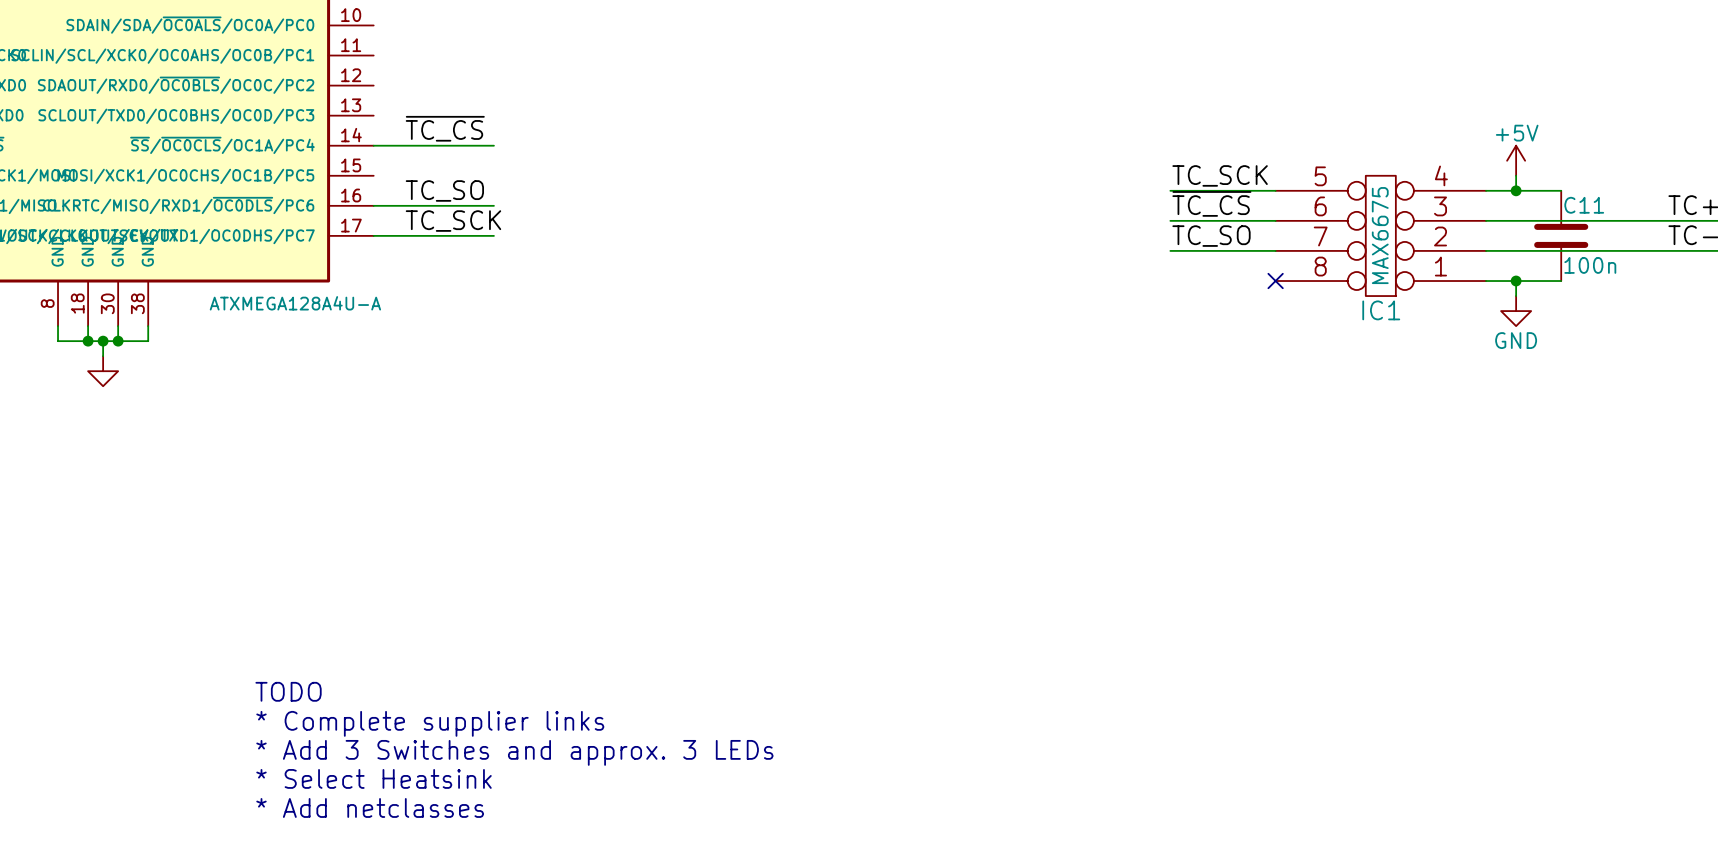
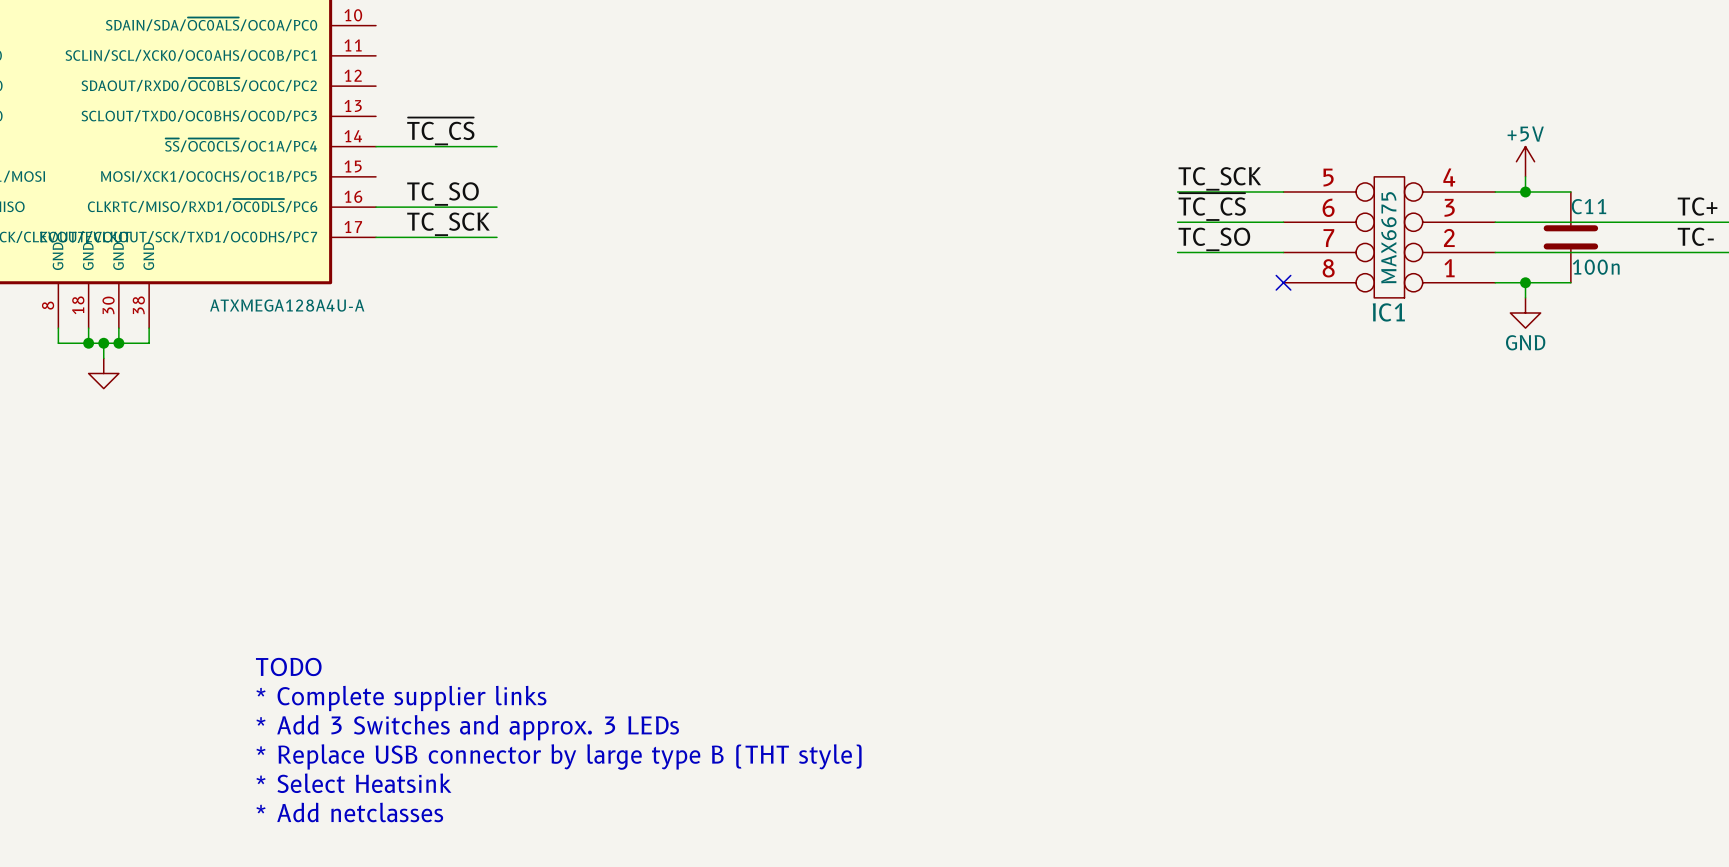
text: none -> TODO (288, 666)
text: TODO (288, 691) -> * Complete supplier links (401, 698)
text: * Complete supplier links (430, 723) -> * Add 3 Switches and approx. 3 LEDs (467, 727)
text: * Add 3 Switches and approx. 3 LEDs (514, 752) -> * Replace USB connector by large type B (THT style) (559, 757)

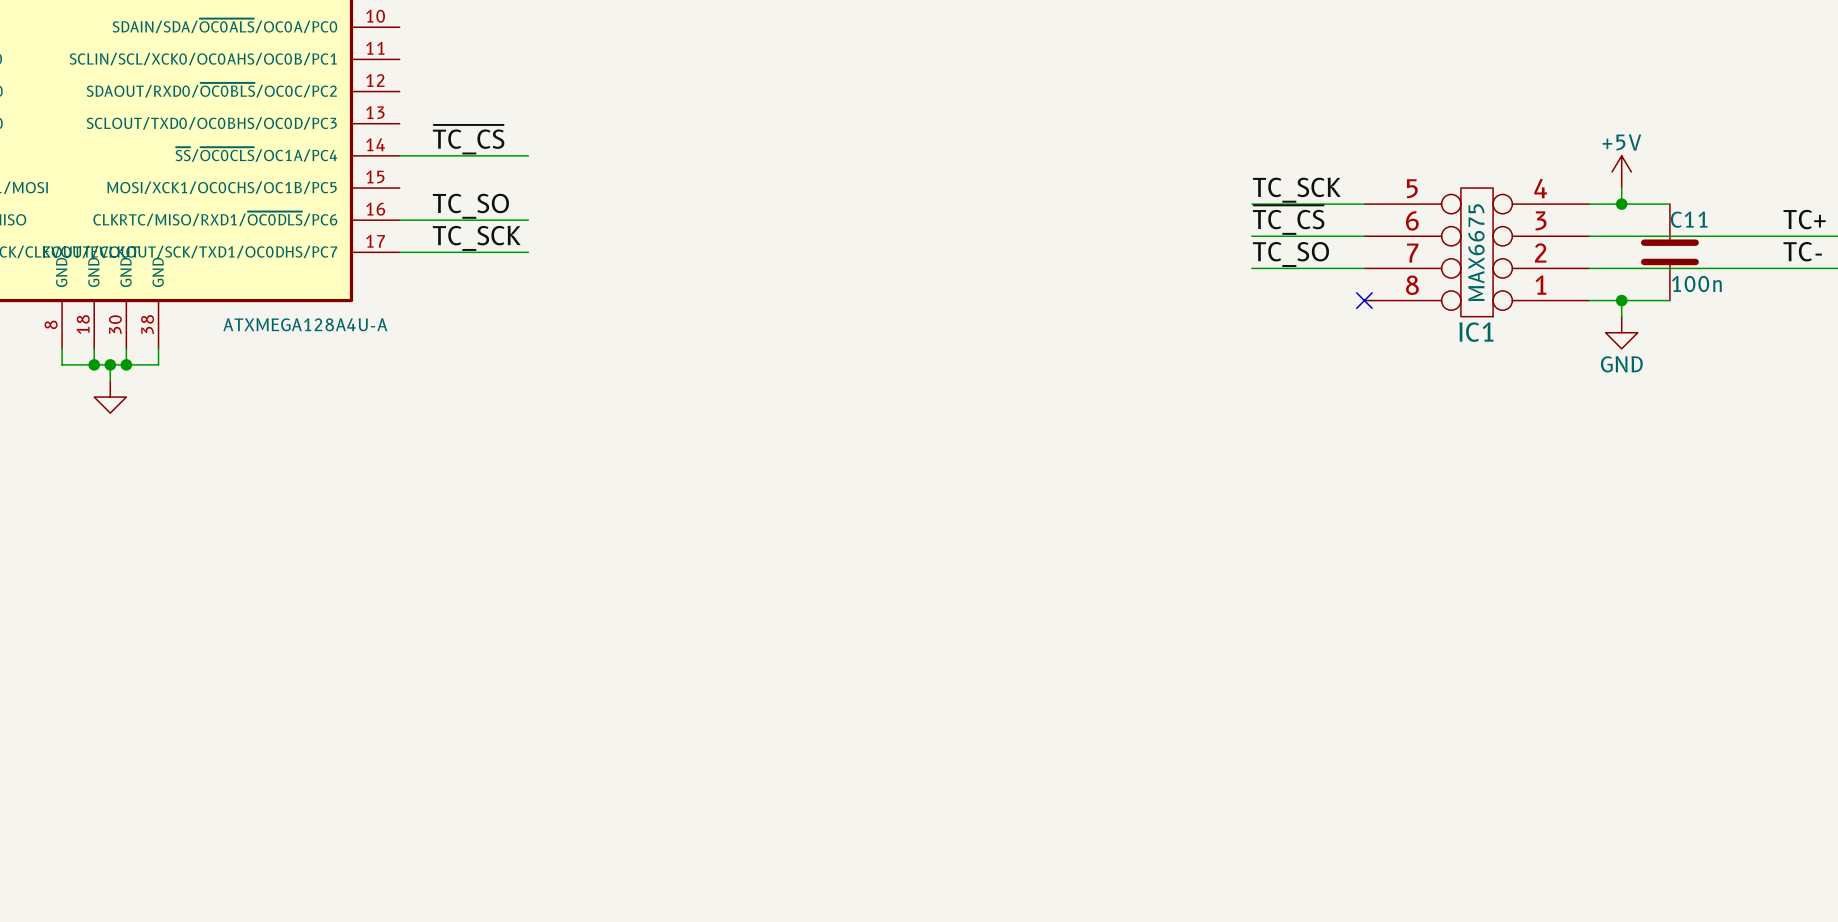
text: TODO (288, 666) -> none
text: * Complete supplier links (401, 698) -> none
text: * Add 3 Switches and approx. 3 LEDs (467, 727) -> none
text: * Replace USB connector by large type B (THT style) (559, 757) -> none
text: * Select Heatsink (353, 783) -> none
text: * Add netclasses (349, 812) -> none

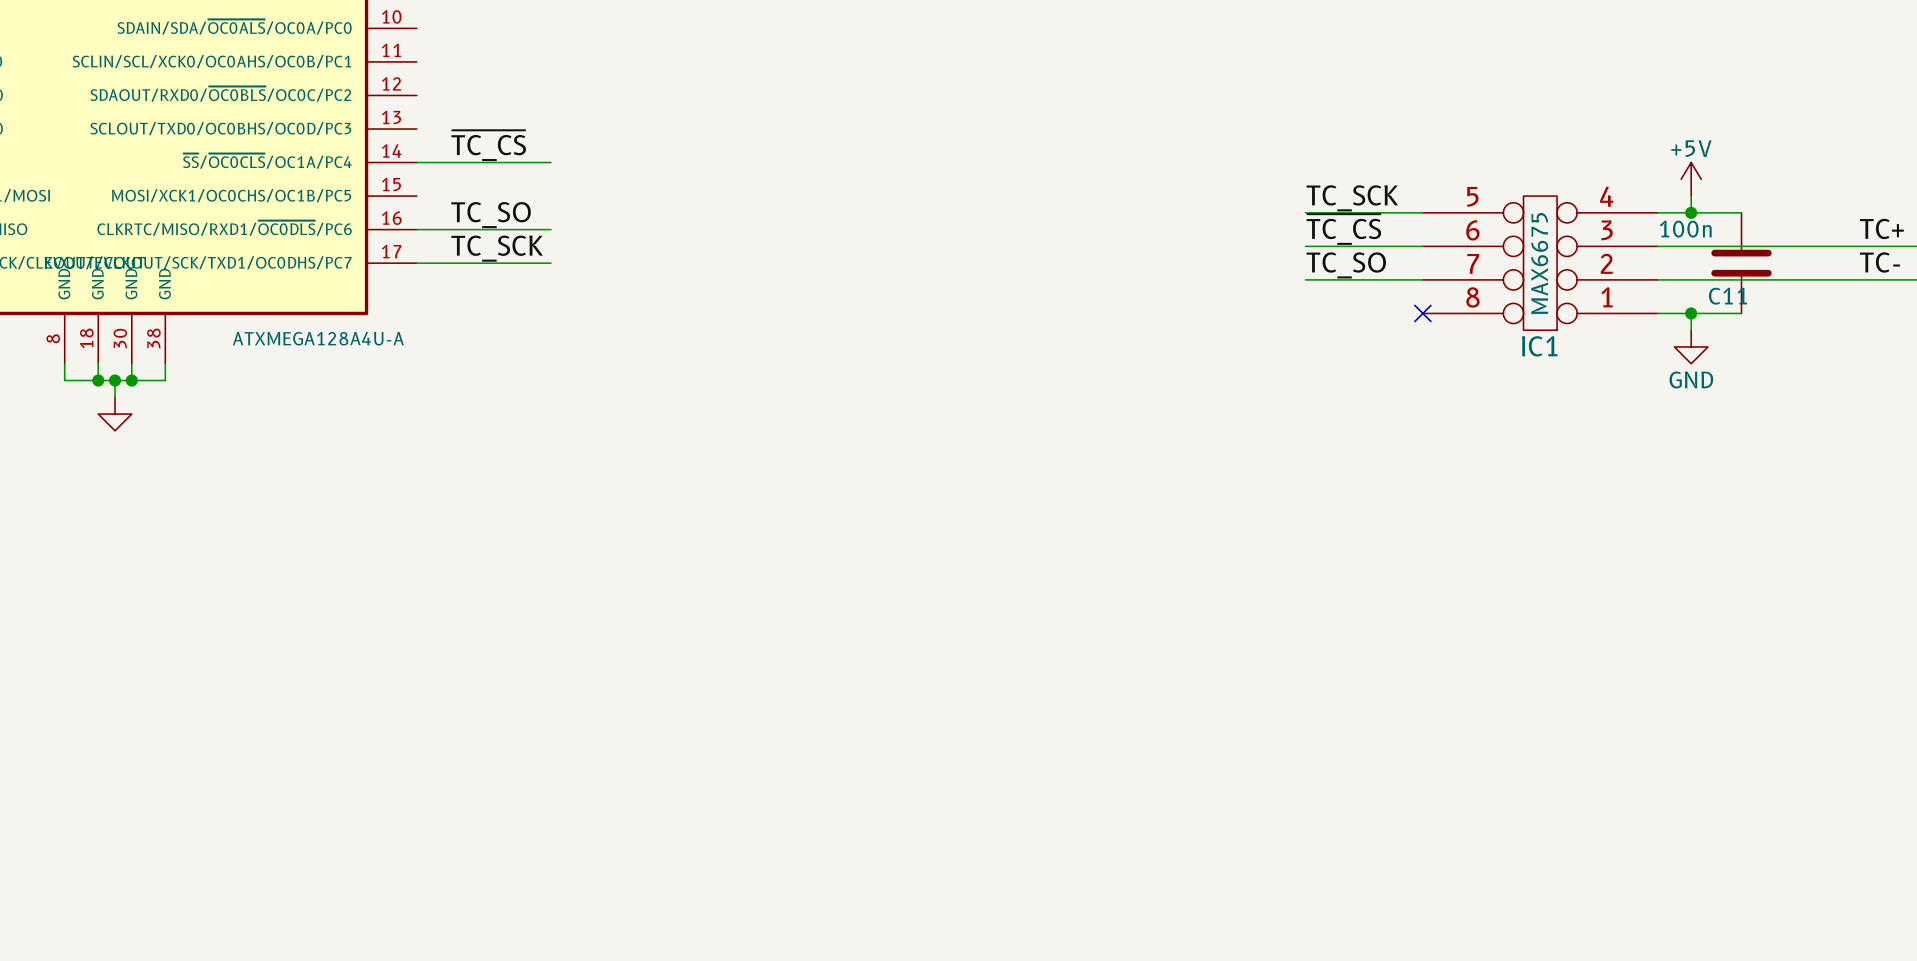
C11 name position: C11 (1689, 219) -> C11 (1728, 296)
C11 value position: 100n (1696, 283) -> 100n (1685, 229)

